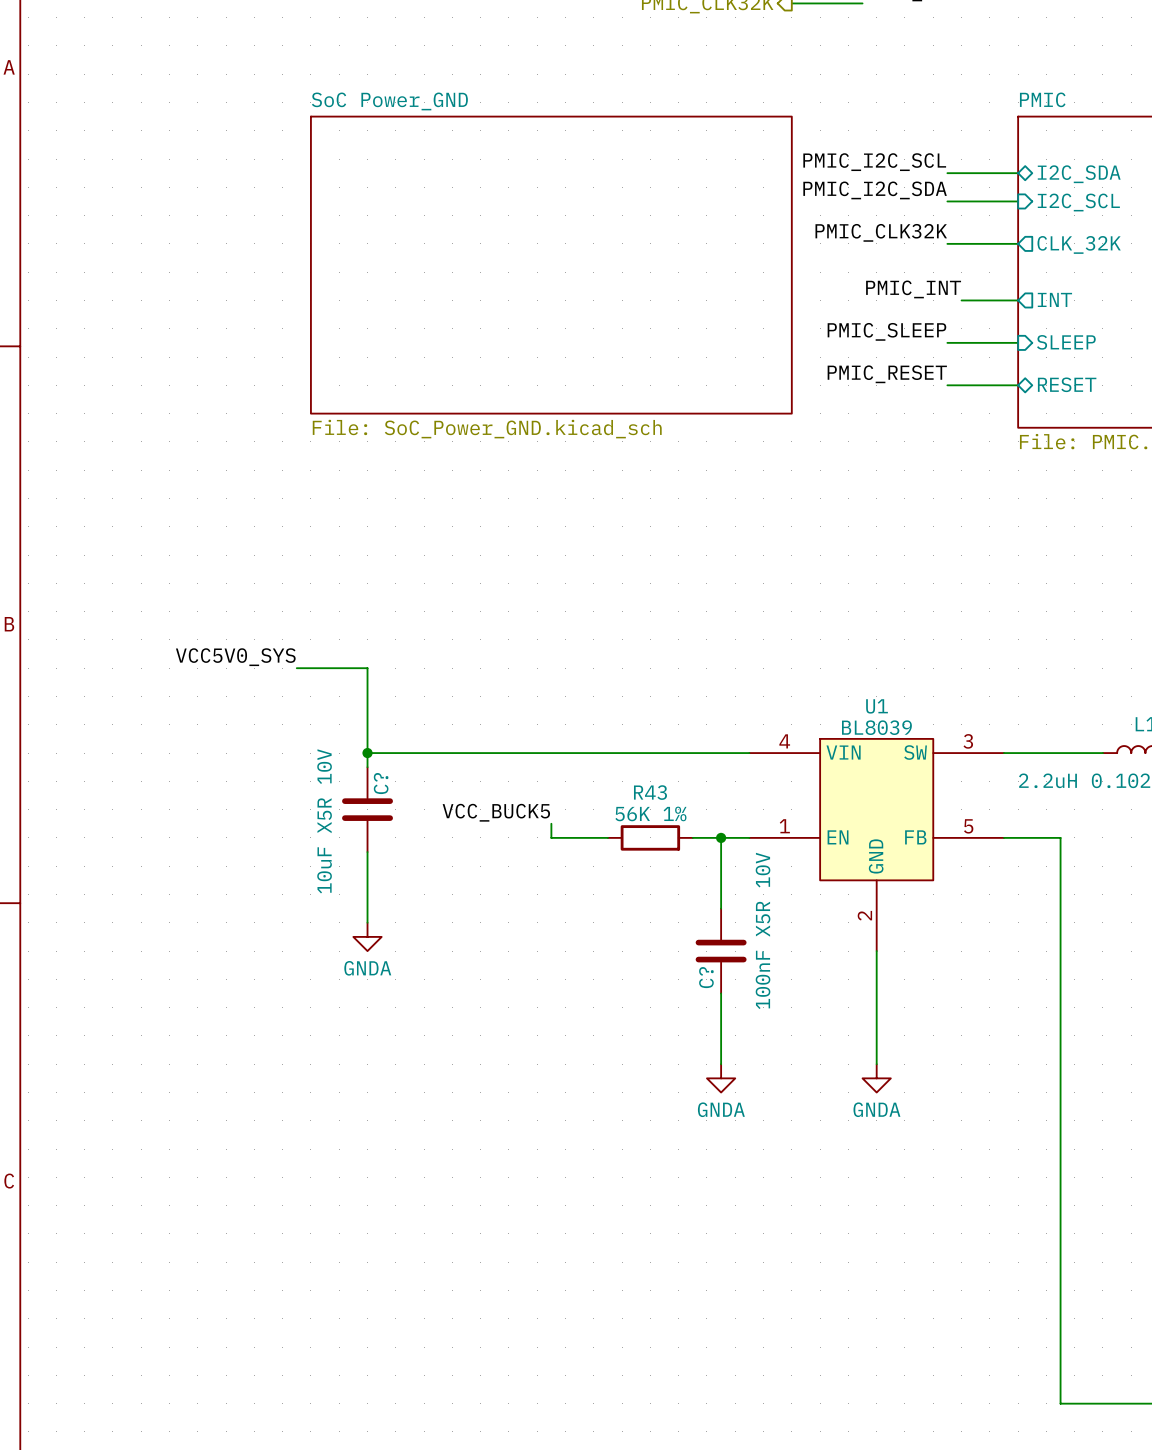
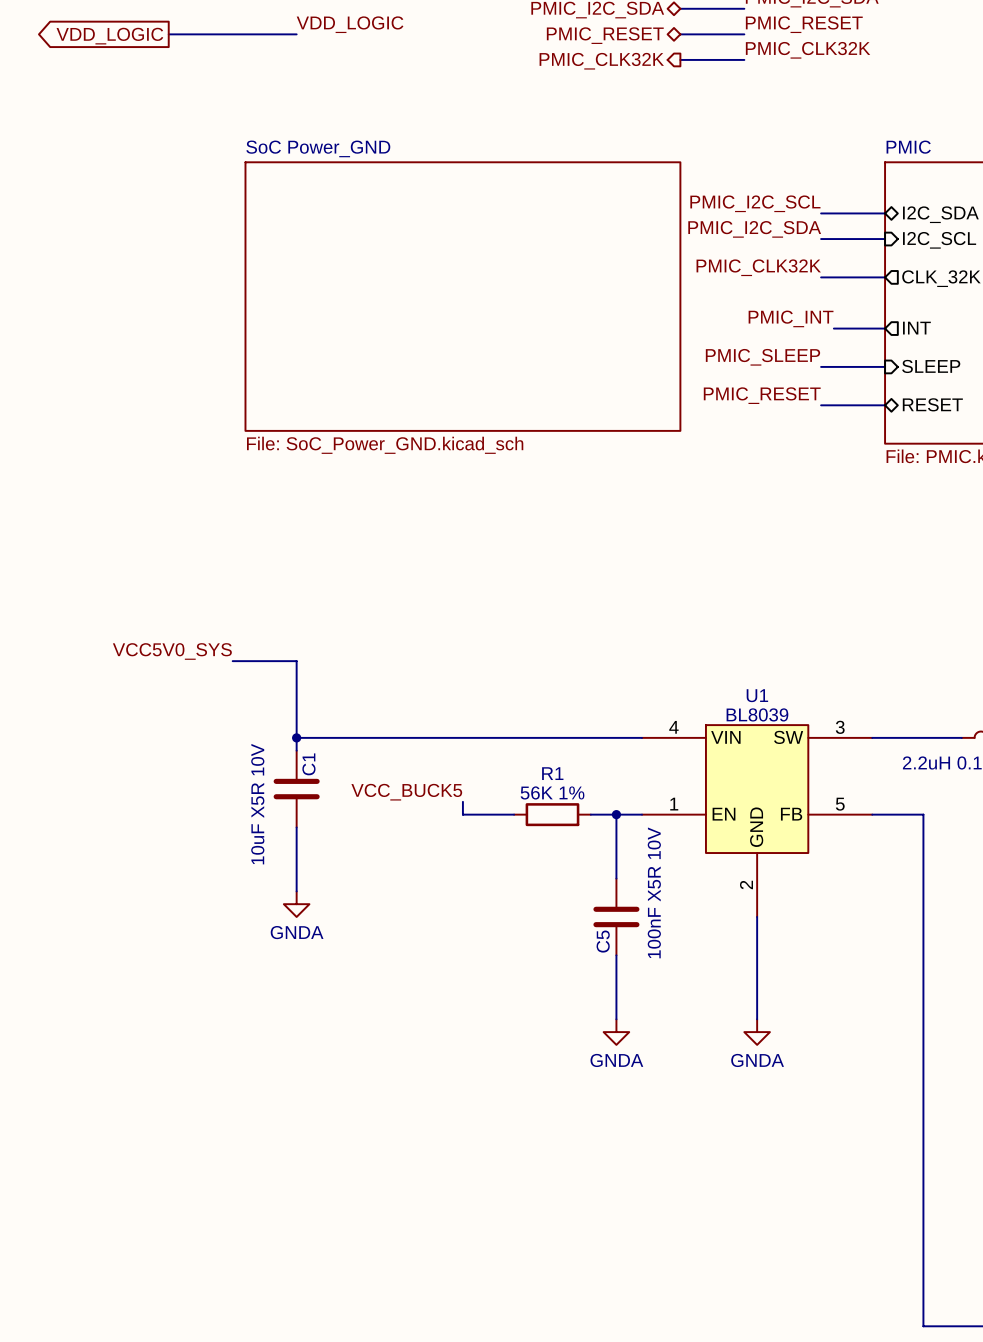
C? name: C? (381, 783) -> C1 (308, 764)
R43 name: R43 (650, 792) -> R1 (552, 773)
C? name: C? (706, 977) -> C5 (603, 941)

